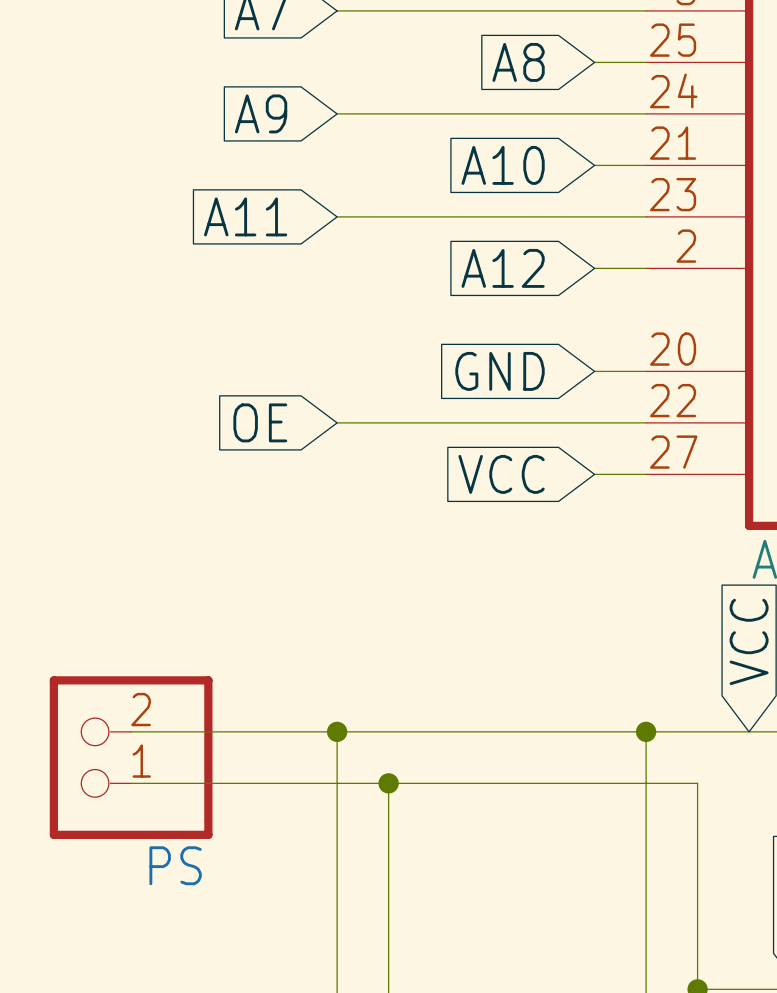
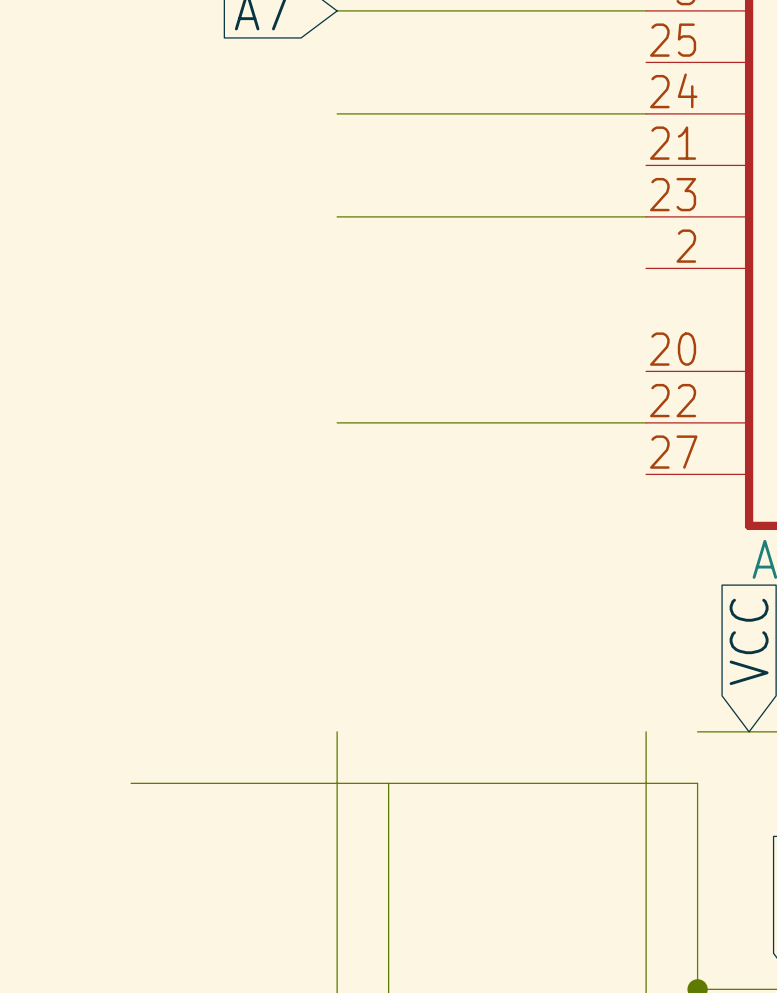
global label: A8 (518, 62) -> none
wire: (594, 62) (646, 62) -> none
global label: A9 (261, 113) -> none
global label: A10 (503, 165) -> none
wire: (594, 165) (646, 165) -> none
global label: A11 (245, 216) -> none
global label: A12 (503, 268) -> none
wire: (594, 268) (646, 268) -> none
global label: GND (500, 371) -> none
wire: (594, 371) (646, 371) -> none
global label: OE (260, 422) -> none
global label: VCC (501, 474) -> none
wire: (594, 474) (646, 474) -> none
wire: (131, 731) (697, 731) -> none
junction: (337, 731) -> none
junction: (646, 731) -> none
PS: (131, 757) -> none
junction: (388, 783) -> none

